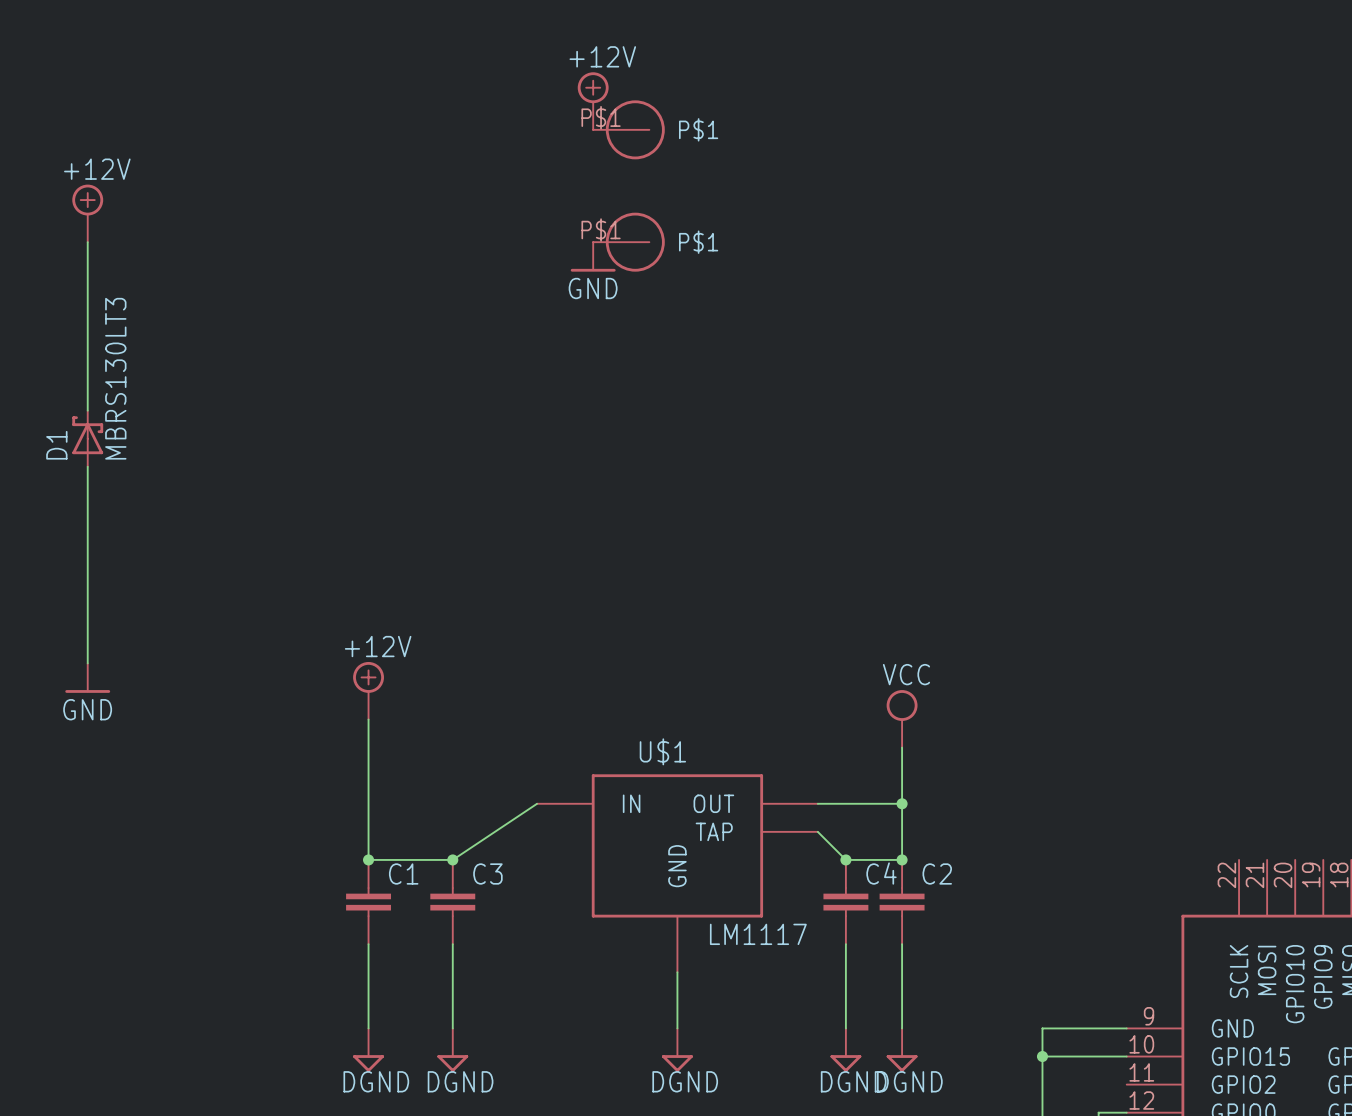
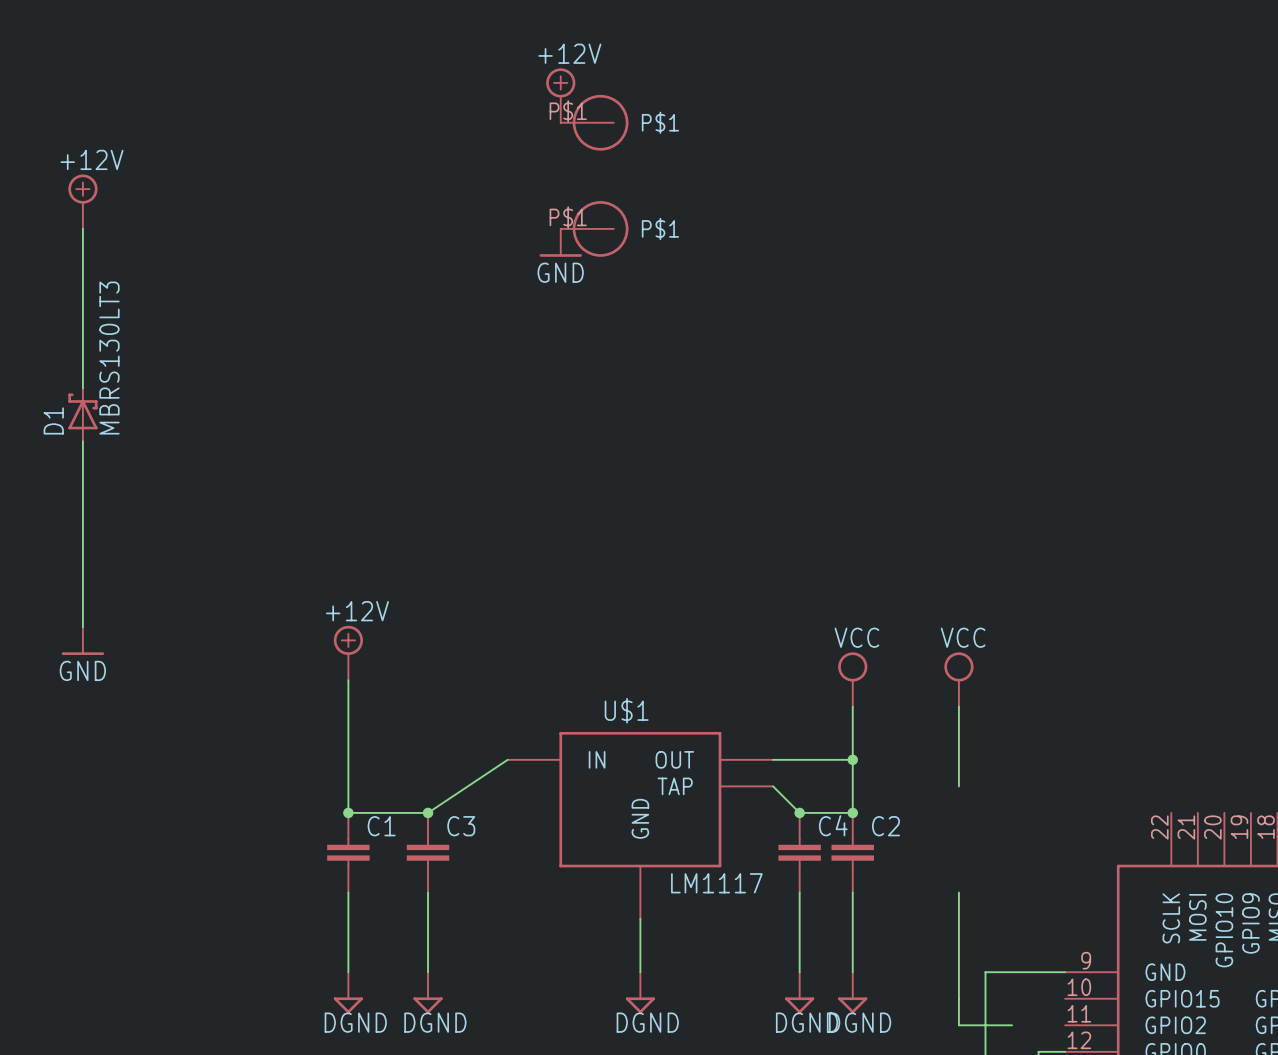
power symbol: none -> VCC (958, 679)
wire: none -> (958, 706) (958, 786)
wire: none -> (958, 892) (958, 1025) (1012, 1025)
wire: (1042, 1056) (1126, 1056) -> none
junction: (1042, 1056) -> none

